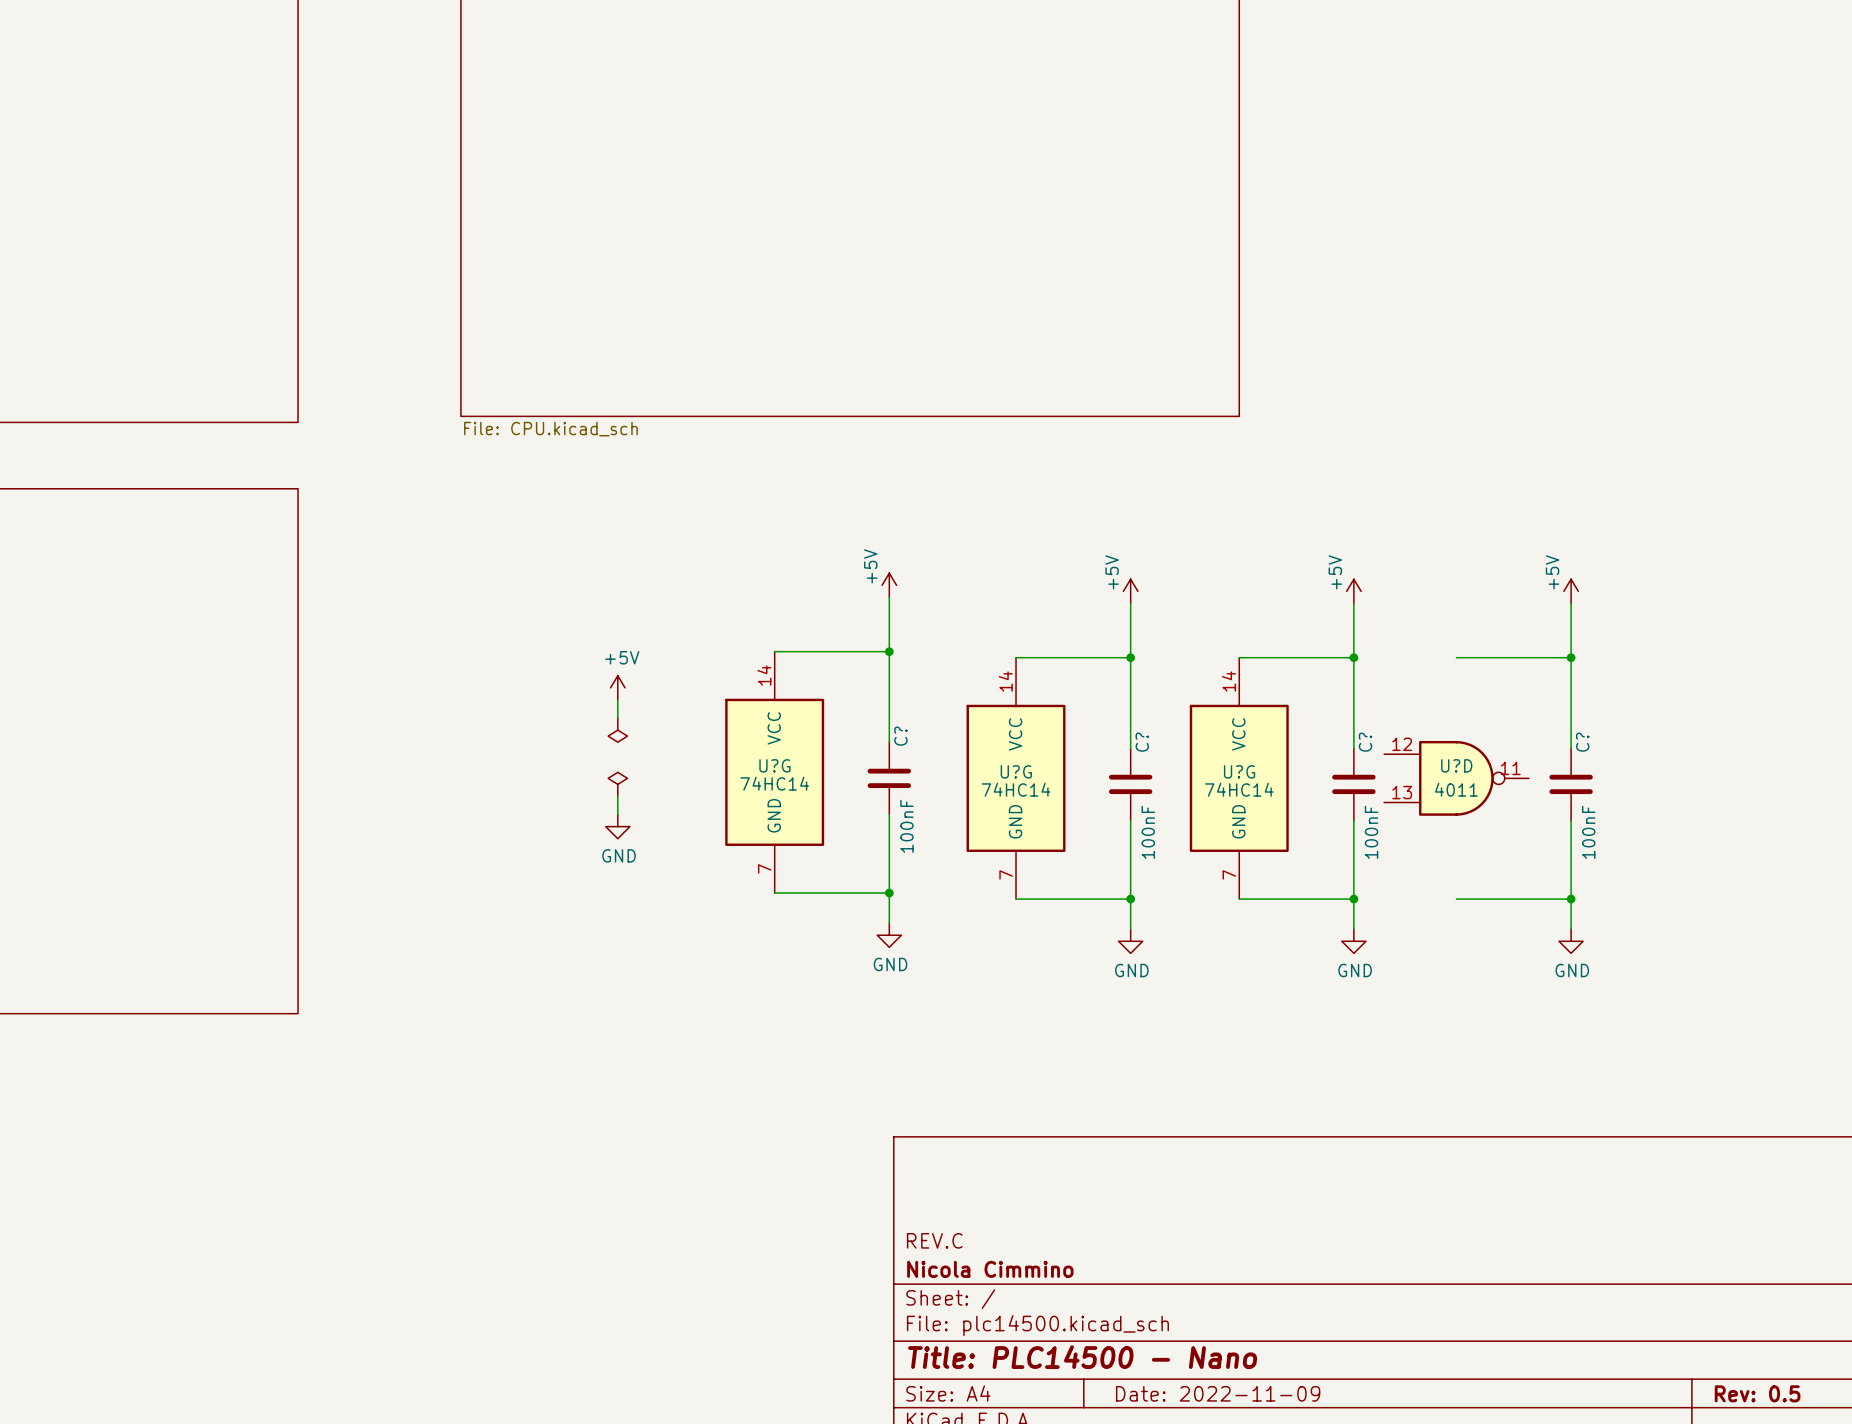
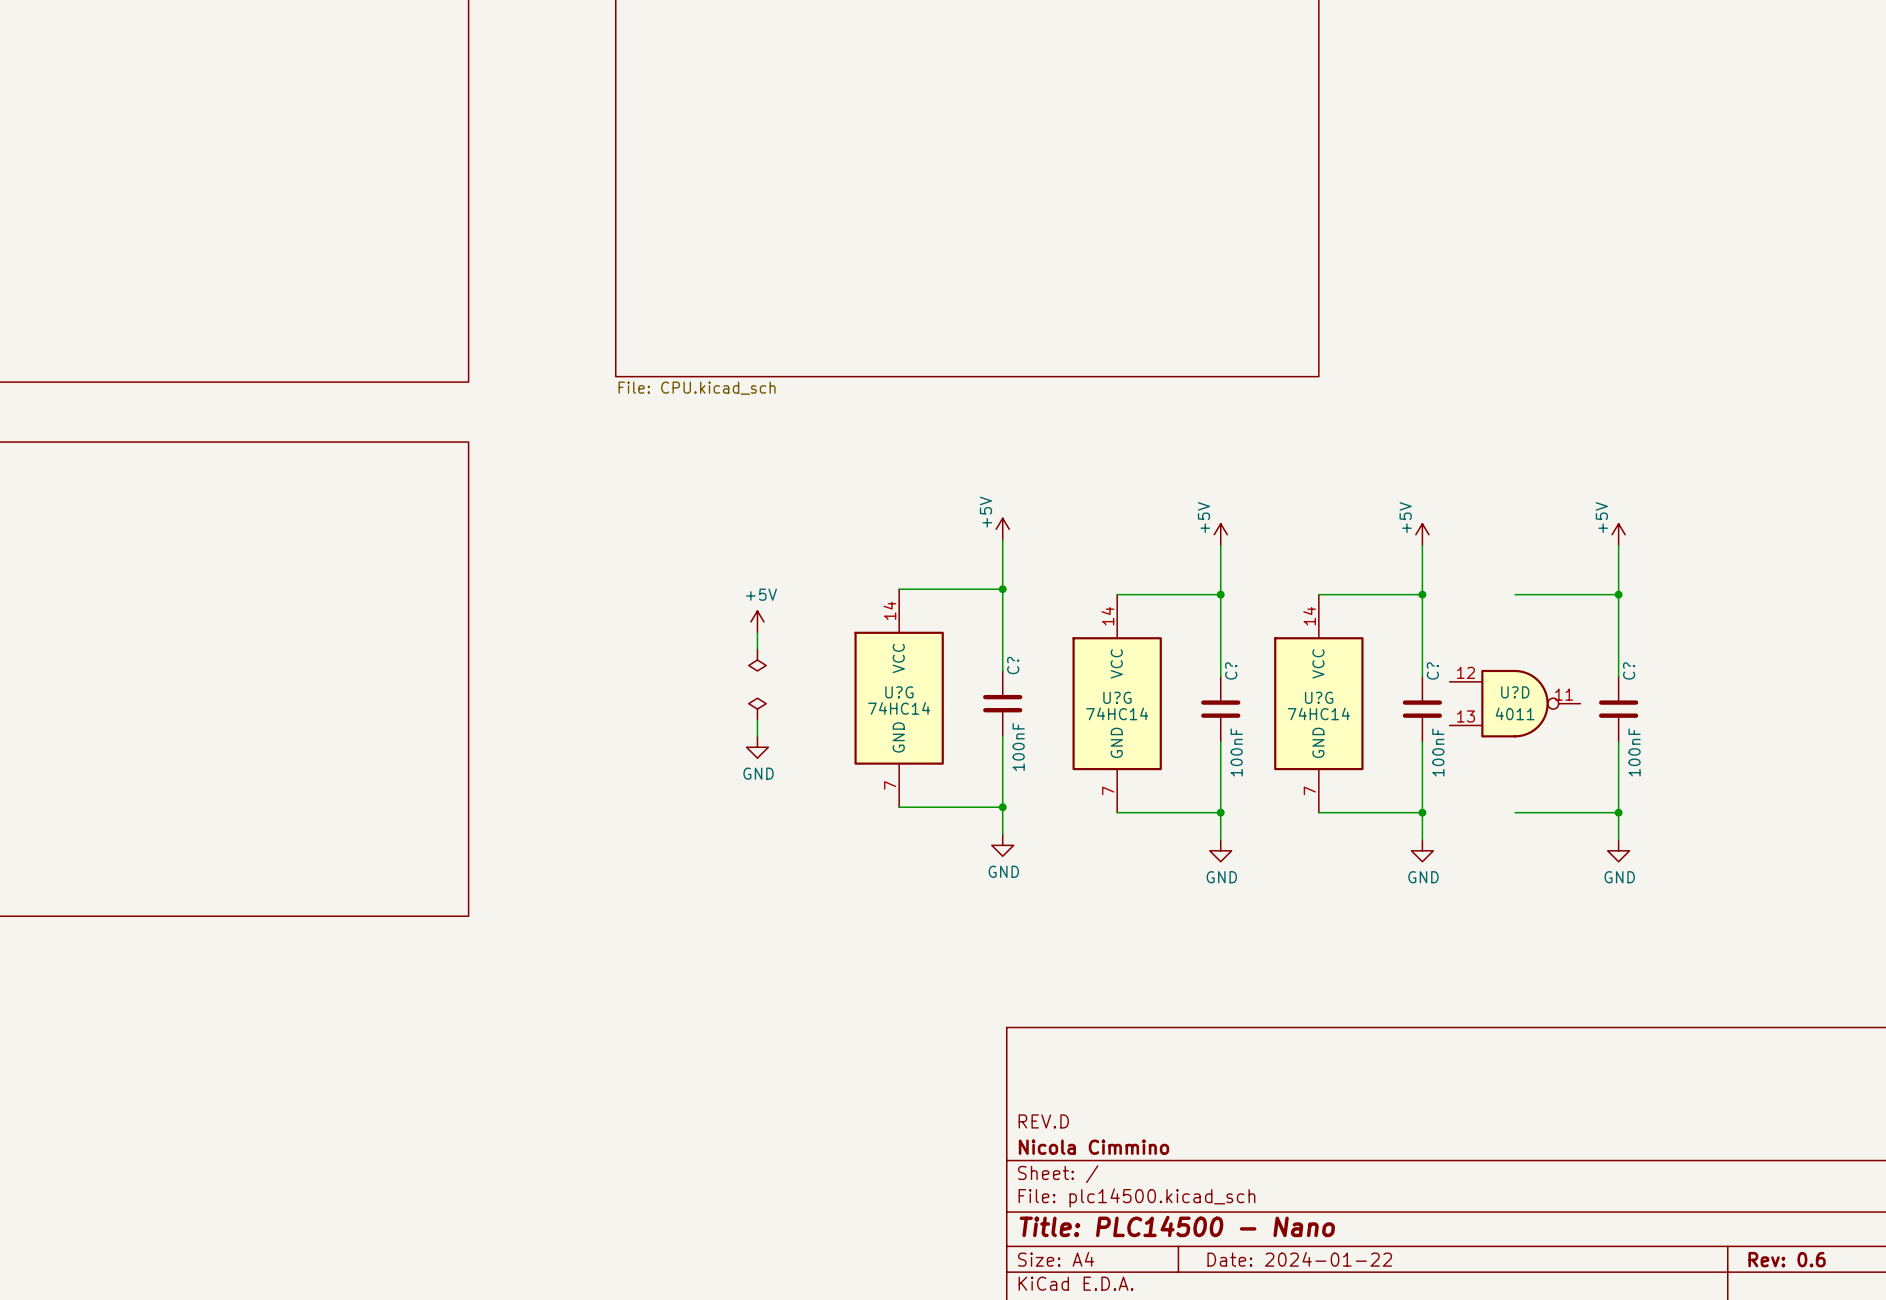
title block: REV.C (934, 1240) -> REV.D (1043, 1121)
title block: Date: 2022-11-09 (1218, 1393) -> Date: 2024-01-22 (1299, 1259)
title block: Rev: 0.5 (1757, 1393) -> Rev: 0.6 (1787, 1259)

